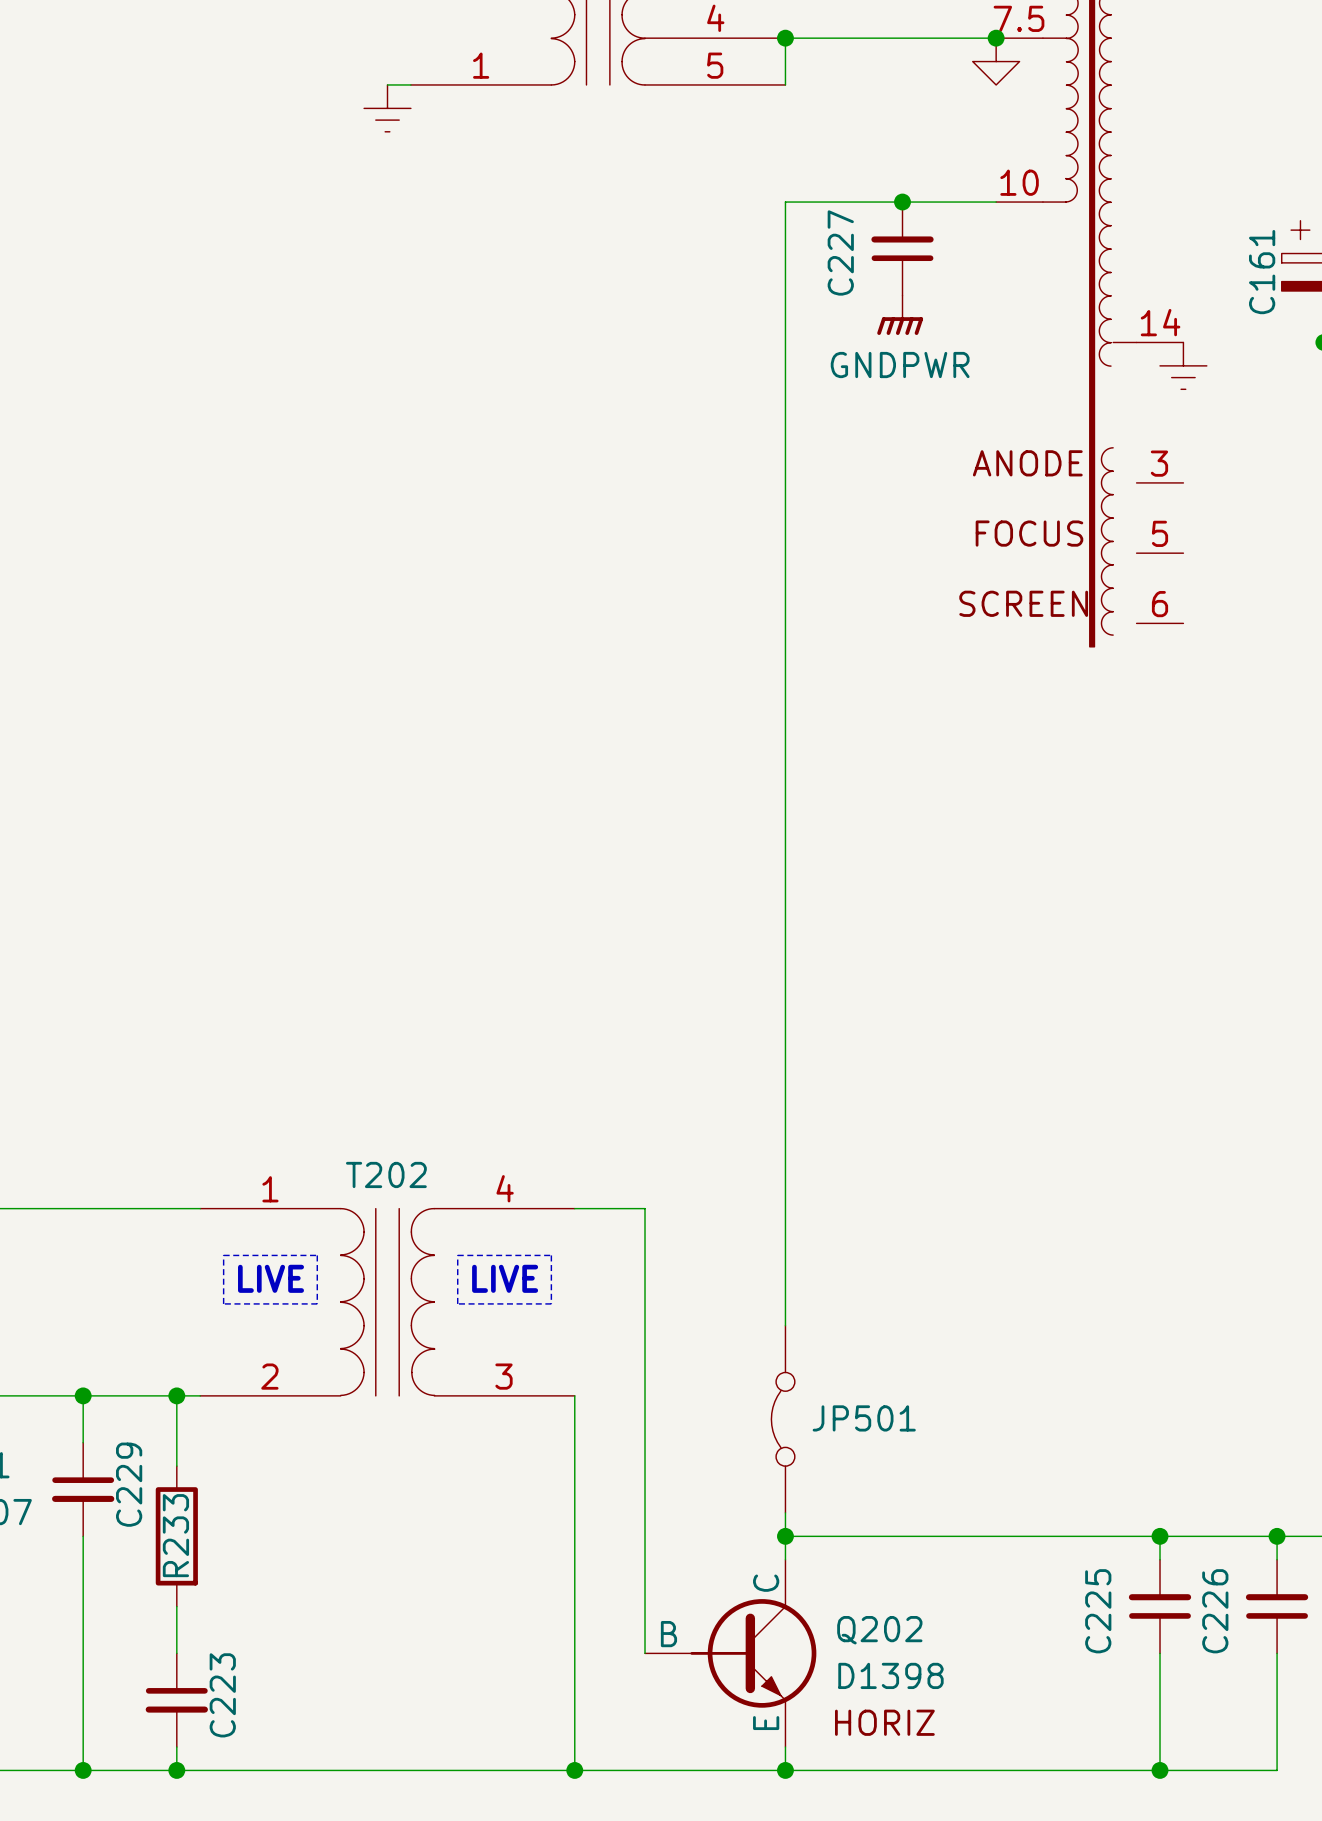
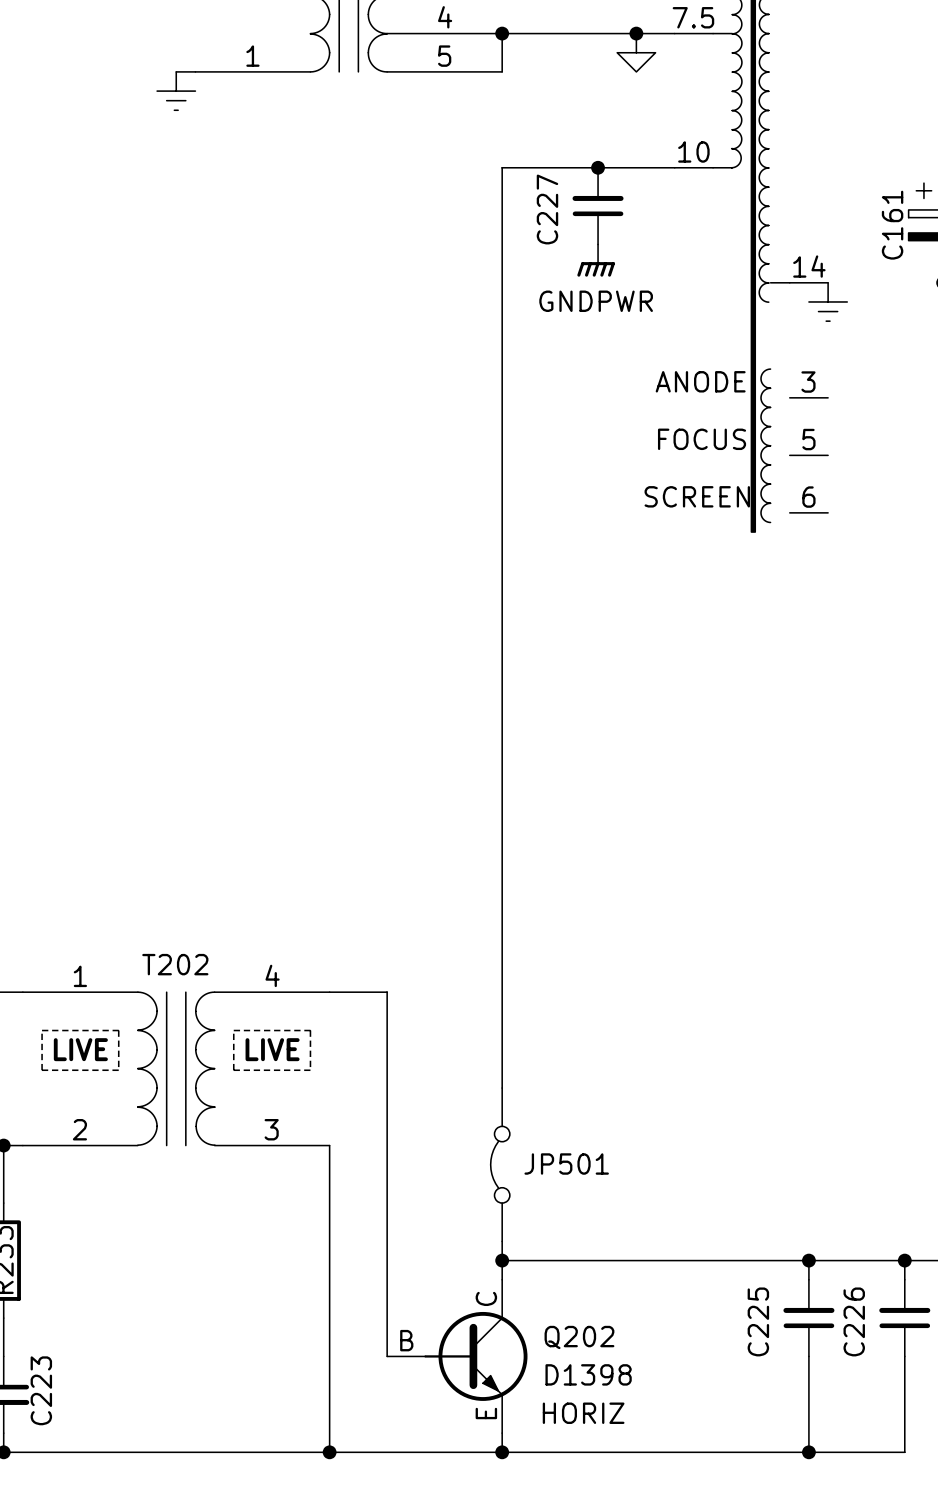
junction position: (996, 38) -> (636, 33)
power symbol position: (996, 61) -> (636, 52)

